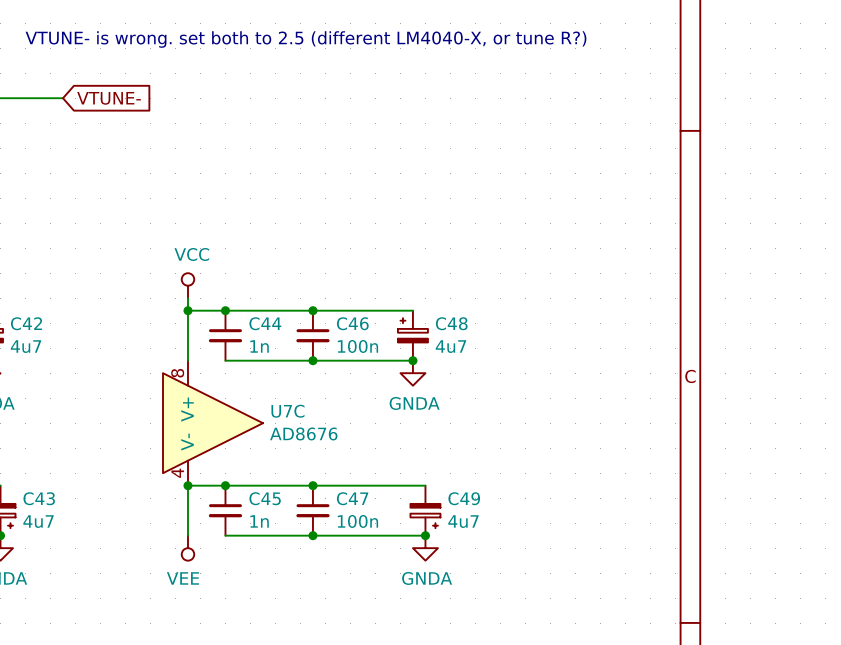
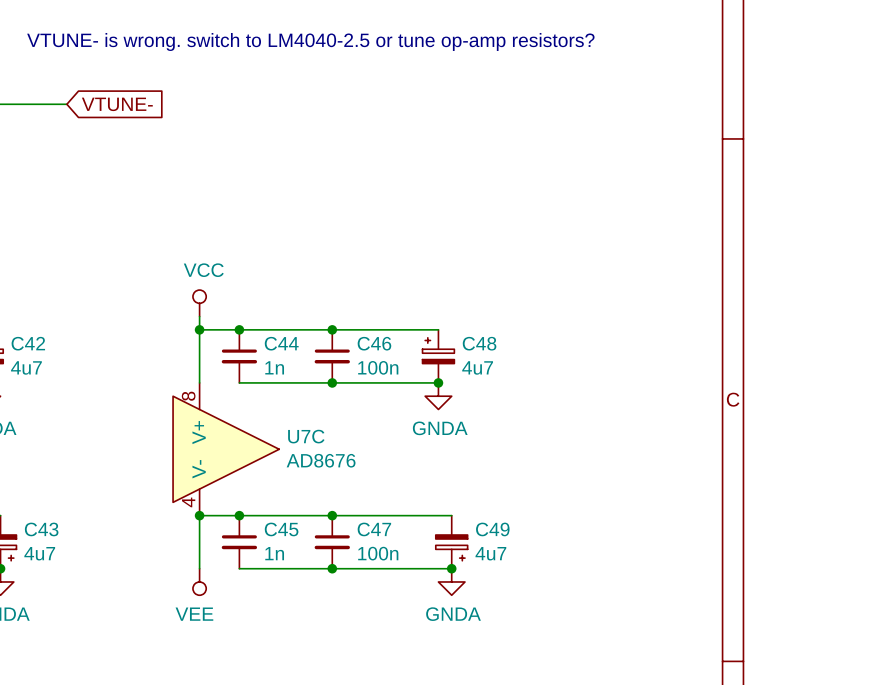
text: VTUNE- is wrong. set both to 2.5 (different LM4040-X, or tune R?) (306, 39) -> VTUNE- is wrong. switch to LM4040-2.5 or tune op-amp resistors? (310, 41)

